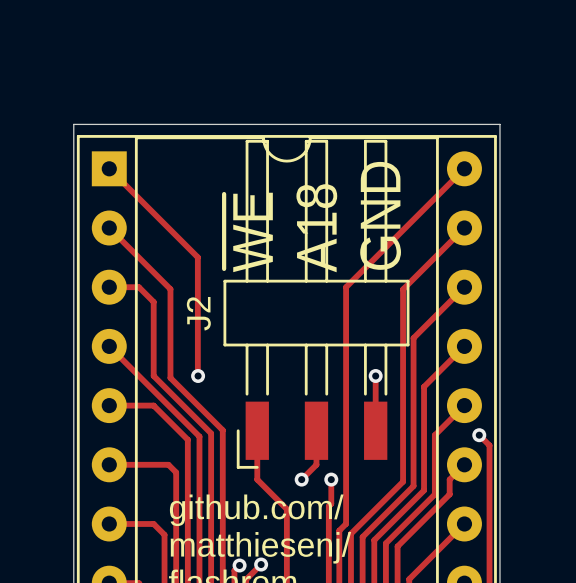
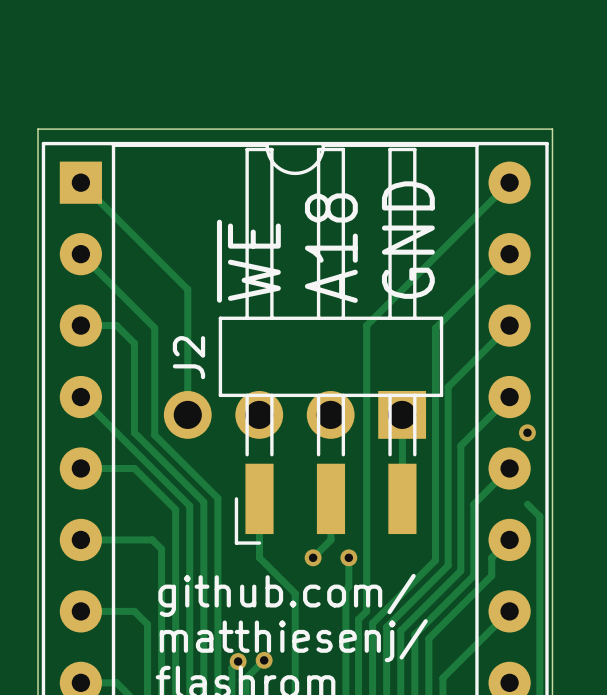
part: none -> (294, 414)
via: (198, 376) -> none
via: (375, 376) -> none
via: none -> (527, 432)
via: (479, 435) -> none

